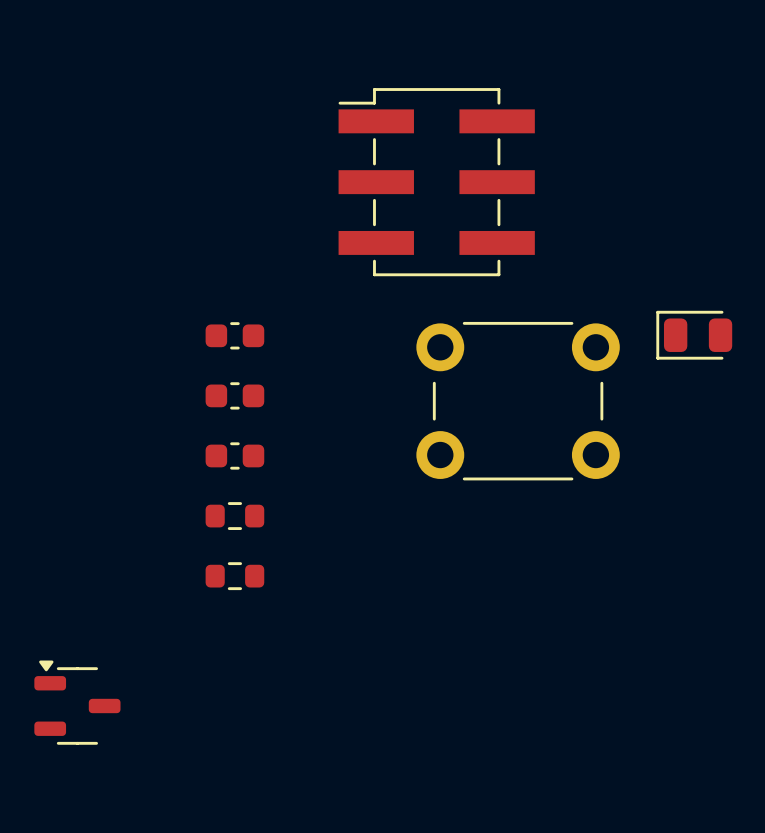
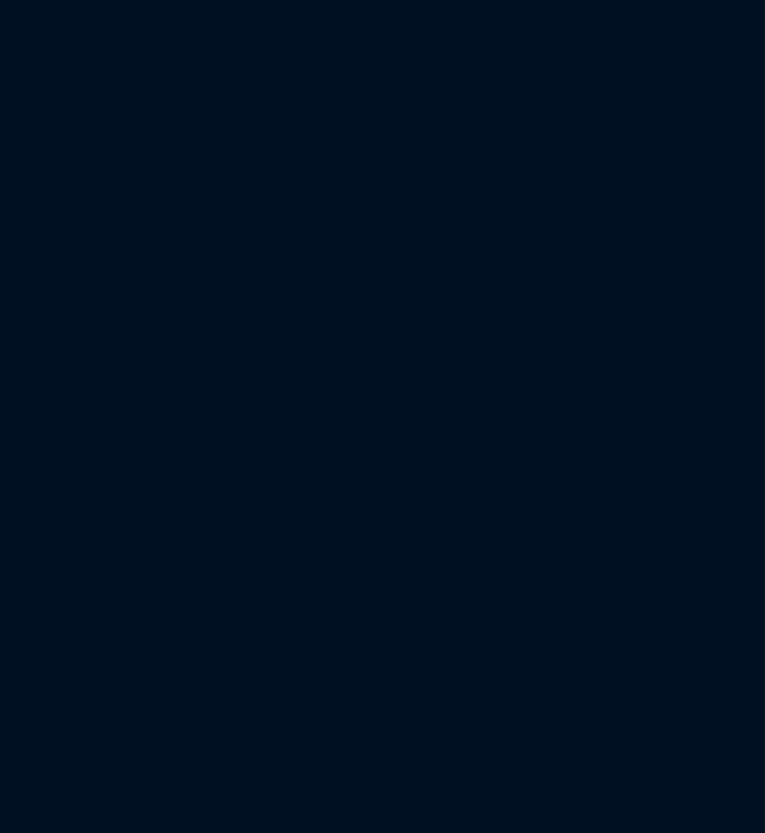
part: (436, 182) -> none
part: (234, 335) -> none
part: (694, 335) -> none
part: (234, 395) -> none
part: (518, 401) -> none
part: (234, 455) -> none
part: (234, 516) -> none
part: (234, 576) -> none
part: (77, 702) -> none

